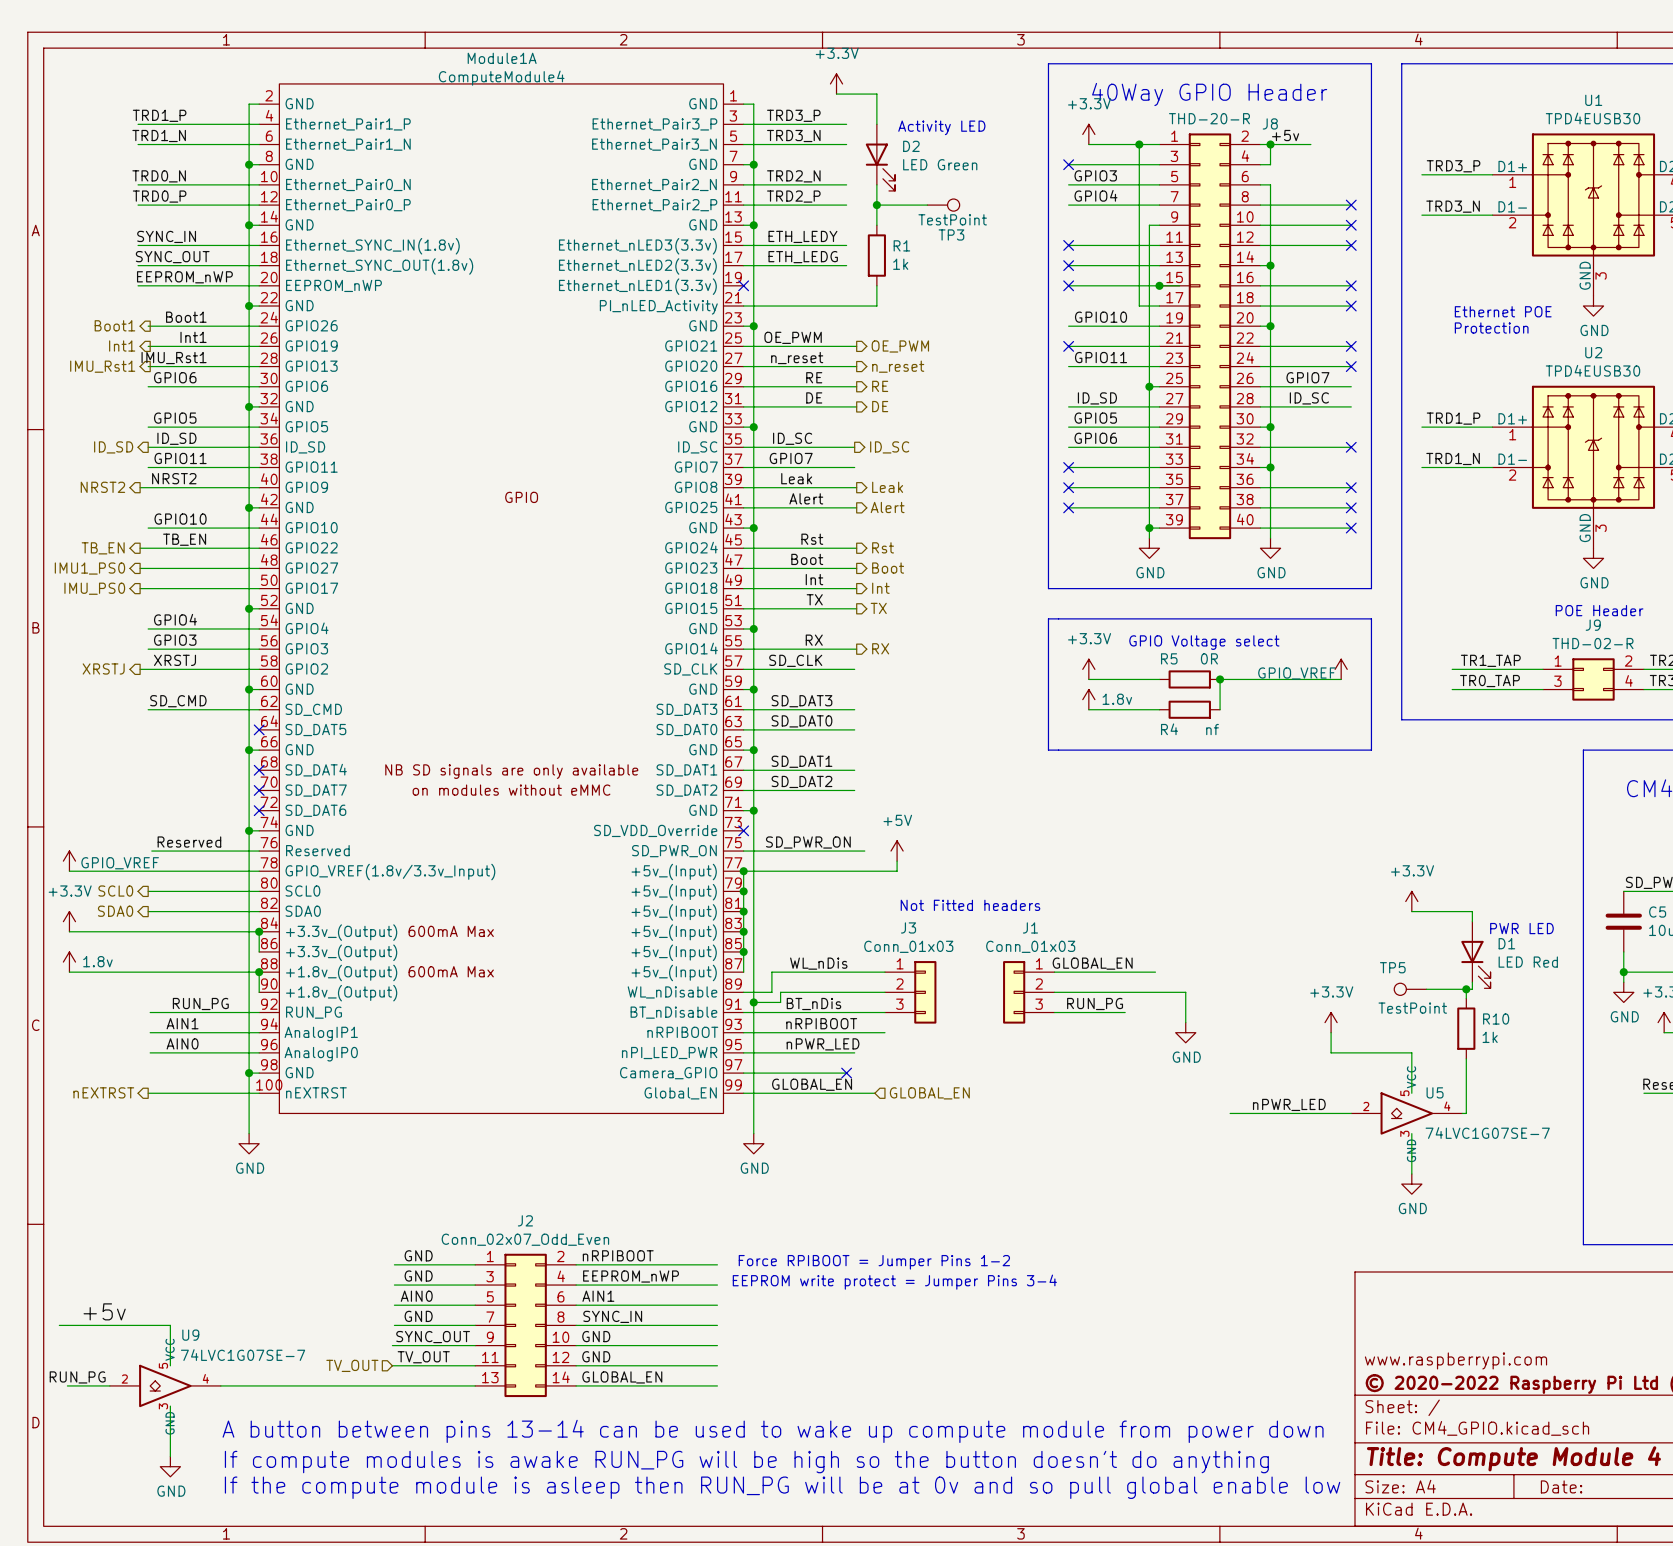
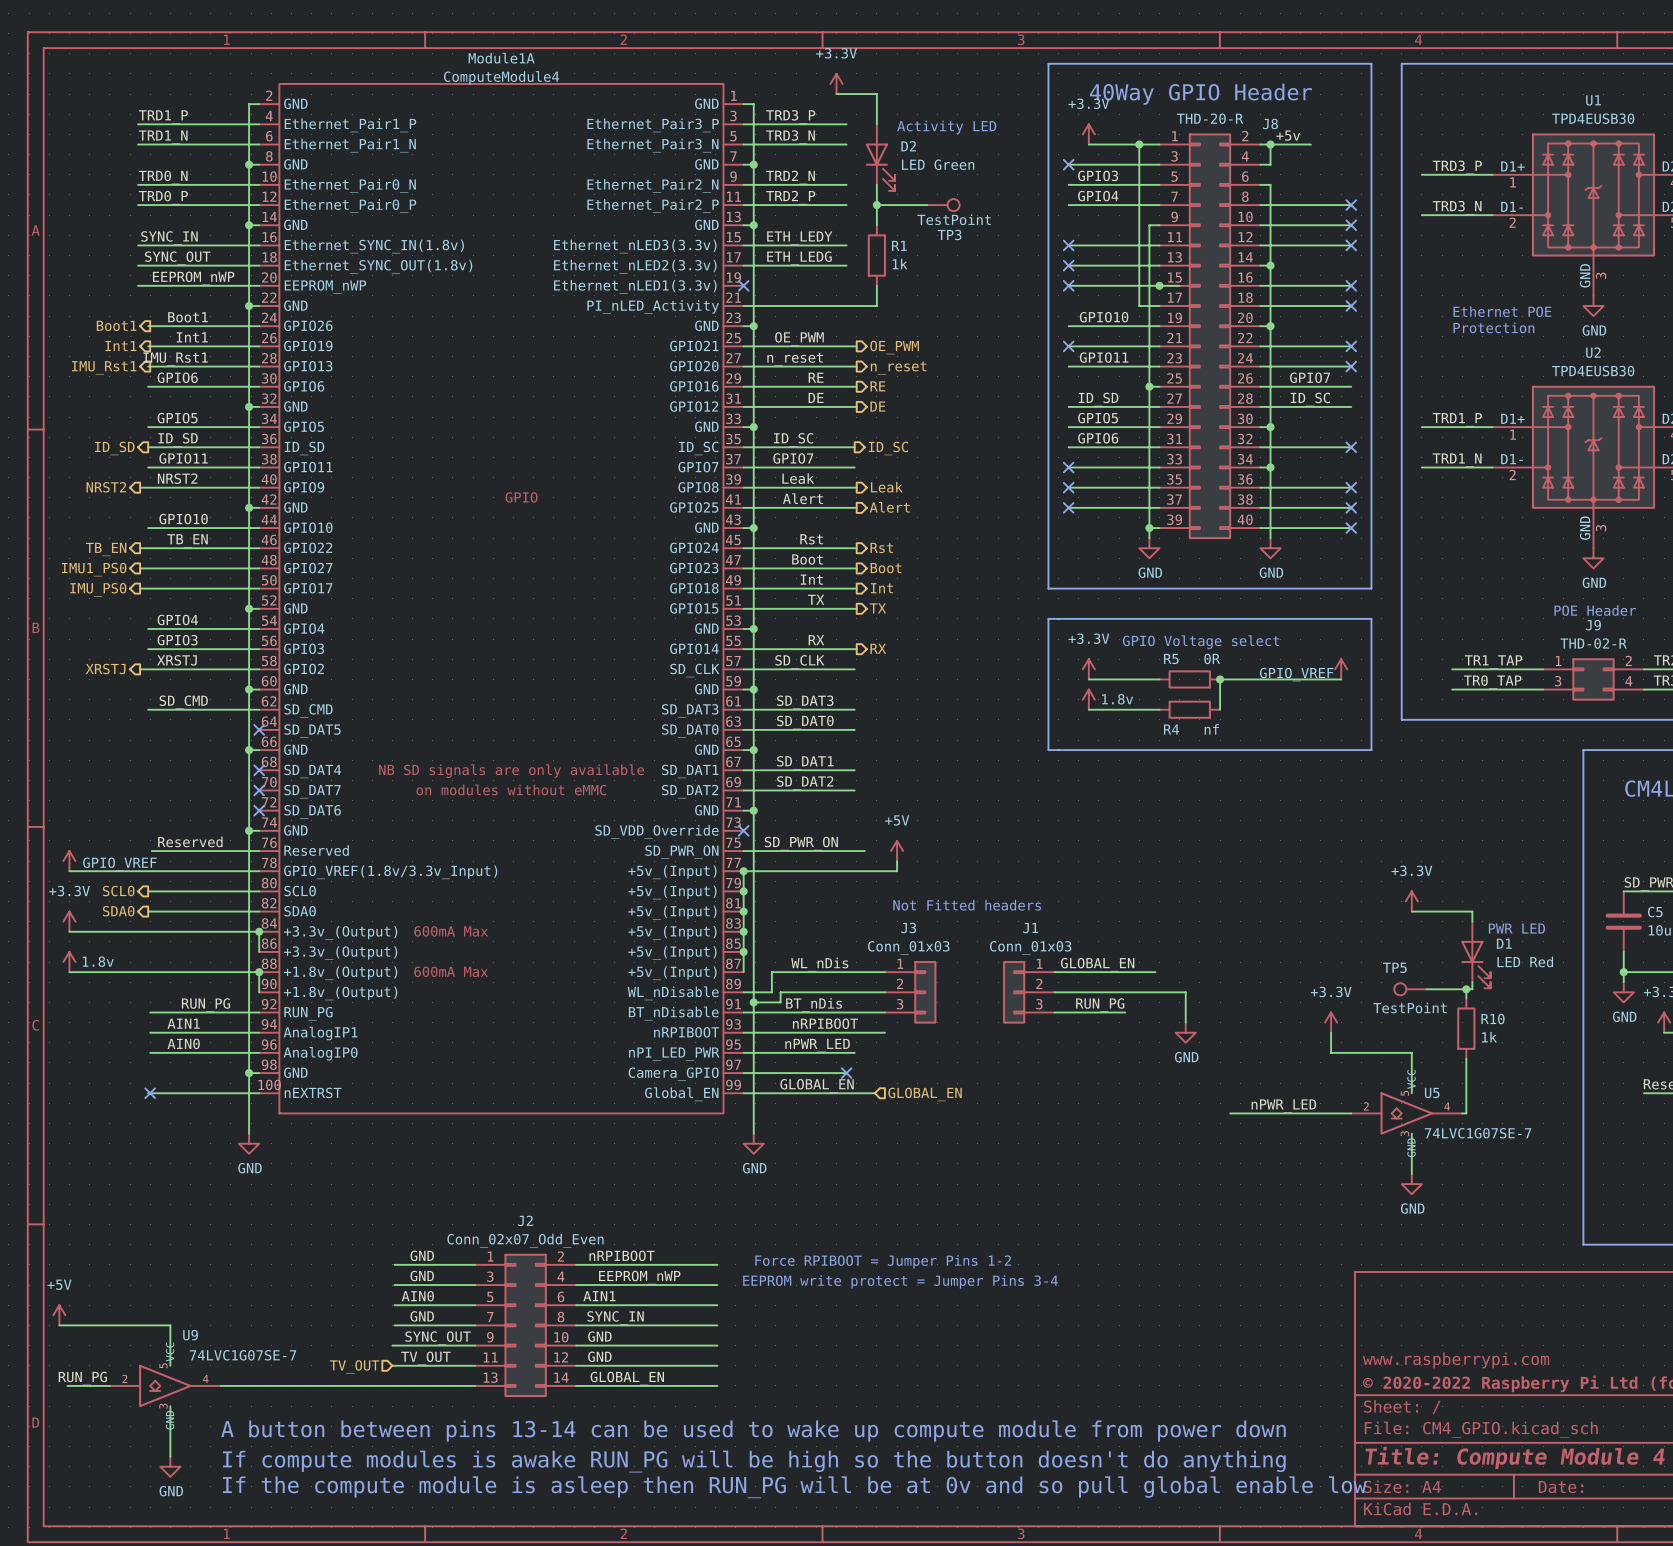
hierarchical label: nEXTRST (103, 1092) -> none
no-connect mark: none -> (150, 1093)
label: +5v (104, 1311) -> none
power symbol: none -> +5V (59, 1315)

